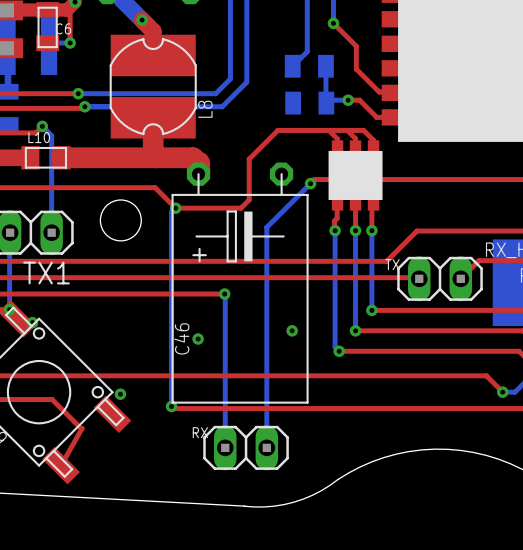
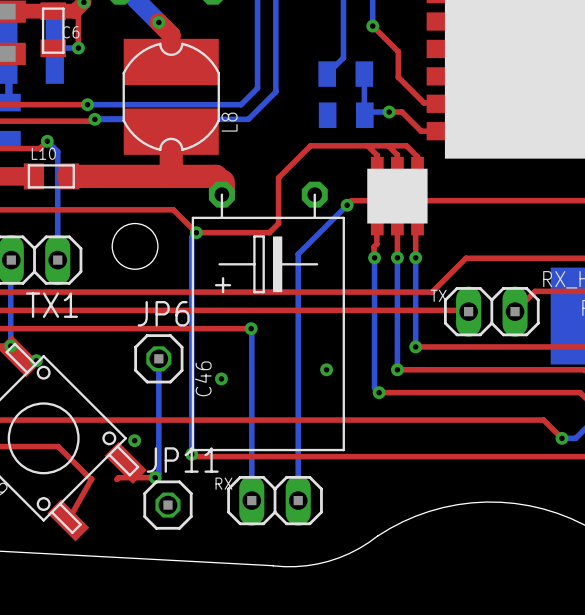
bottom track: none -> (158, 358) (158, 473) (155, 477)
JP6: none -> (158, 358)
top track: none -> (155, 477) (118, 477) (116, 479)
via: none -> (155, 477)
JP11: none -> (167, 505)

